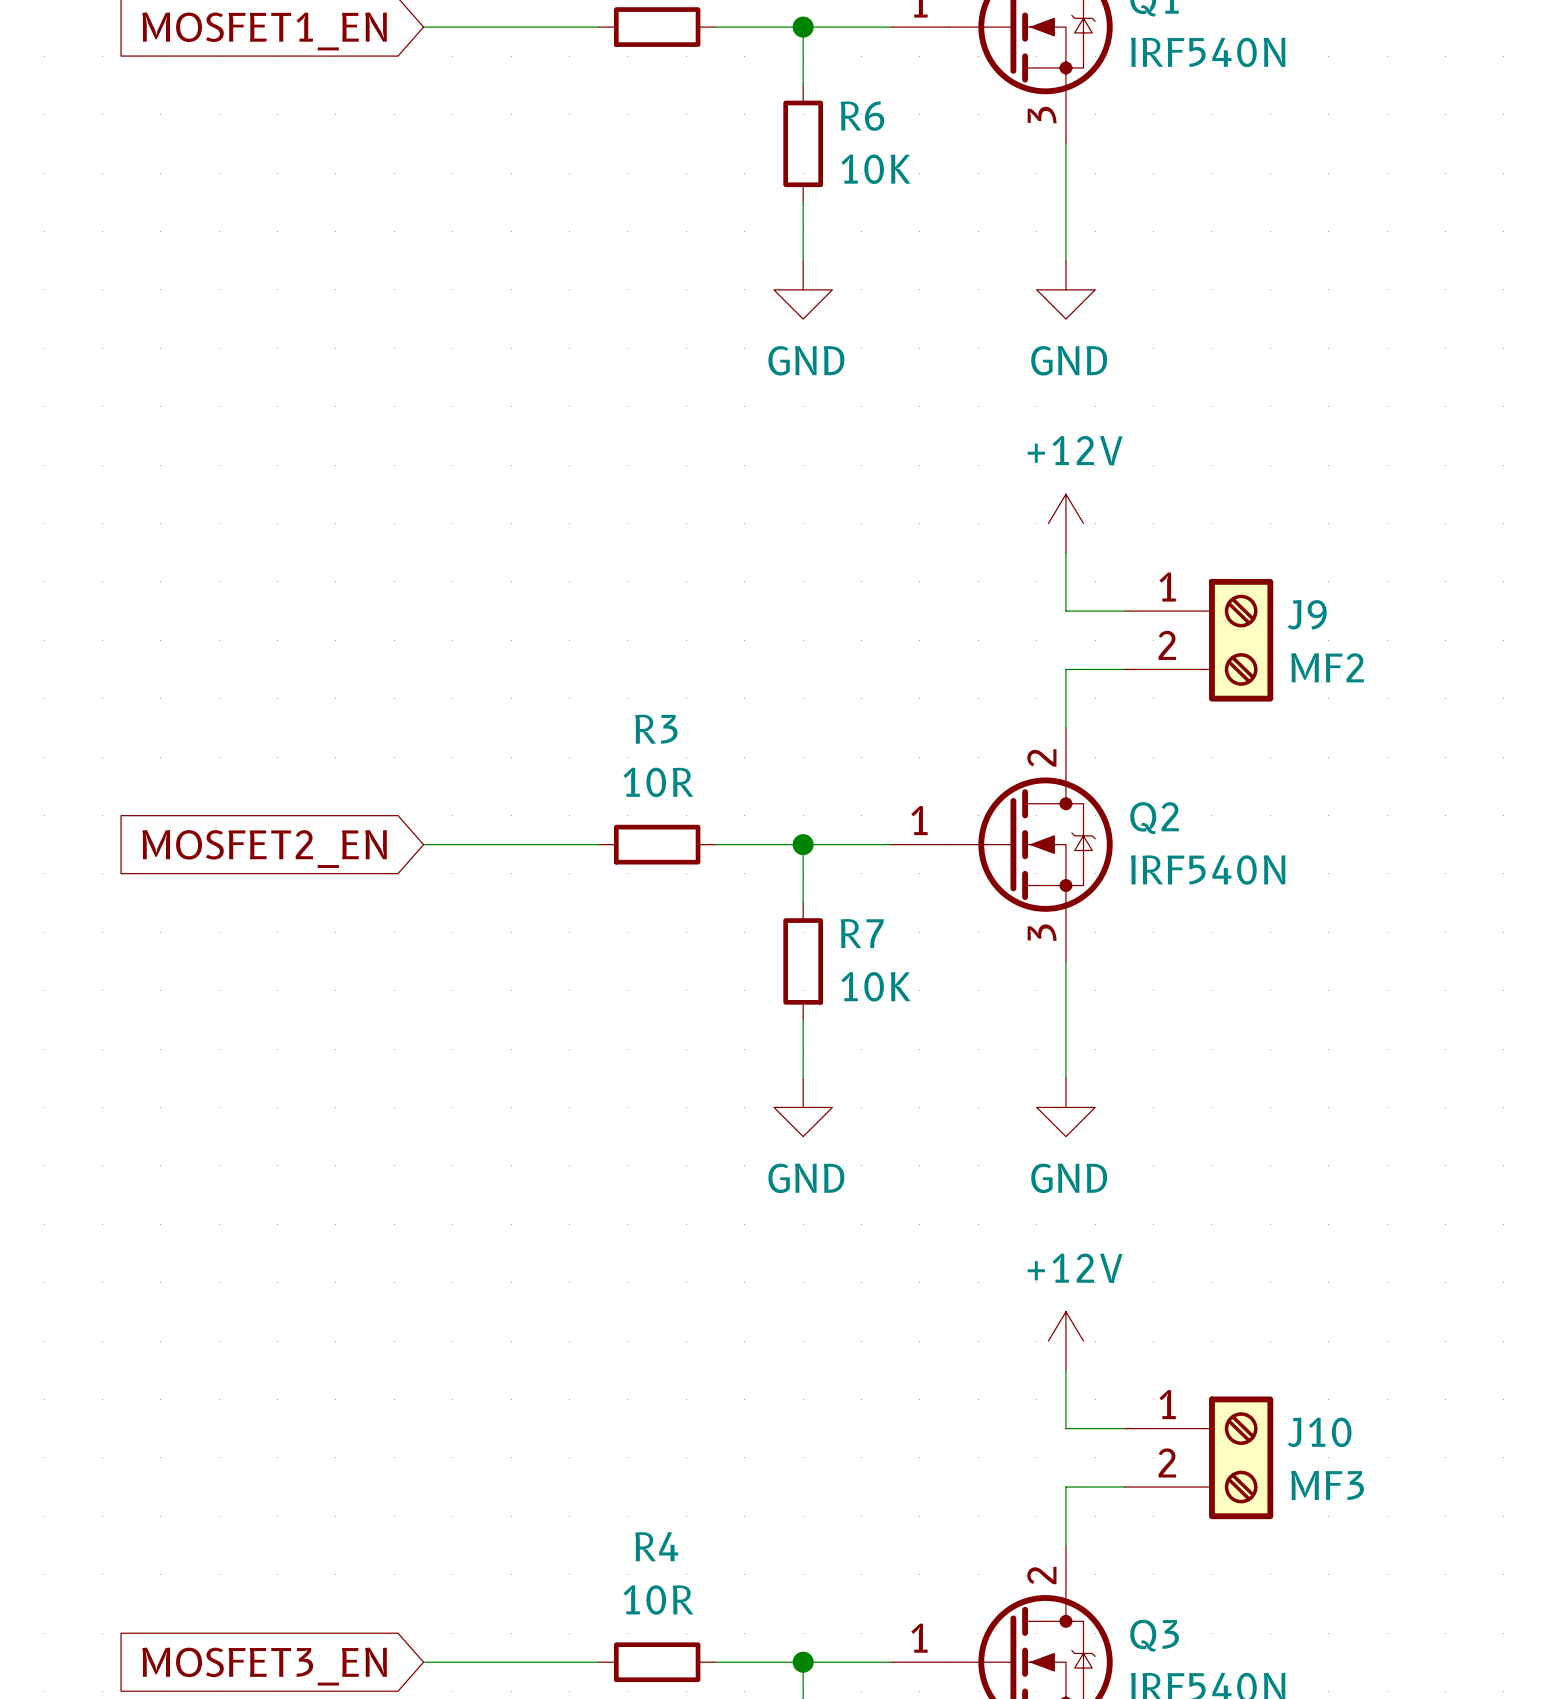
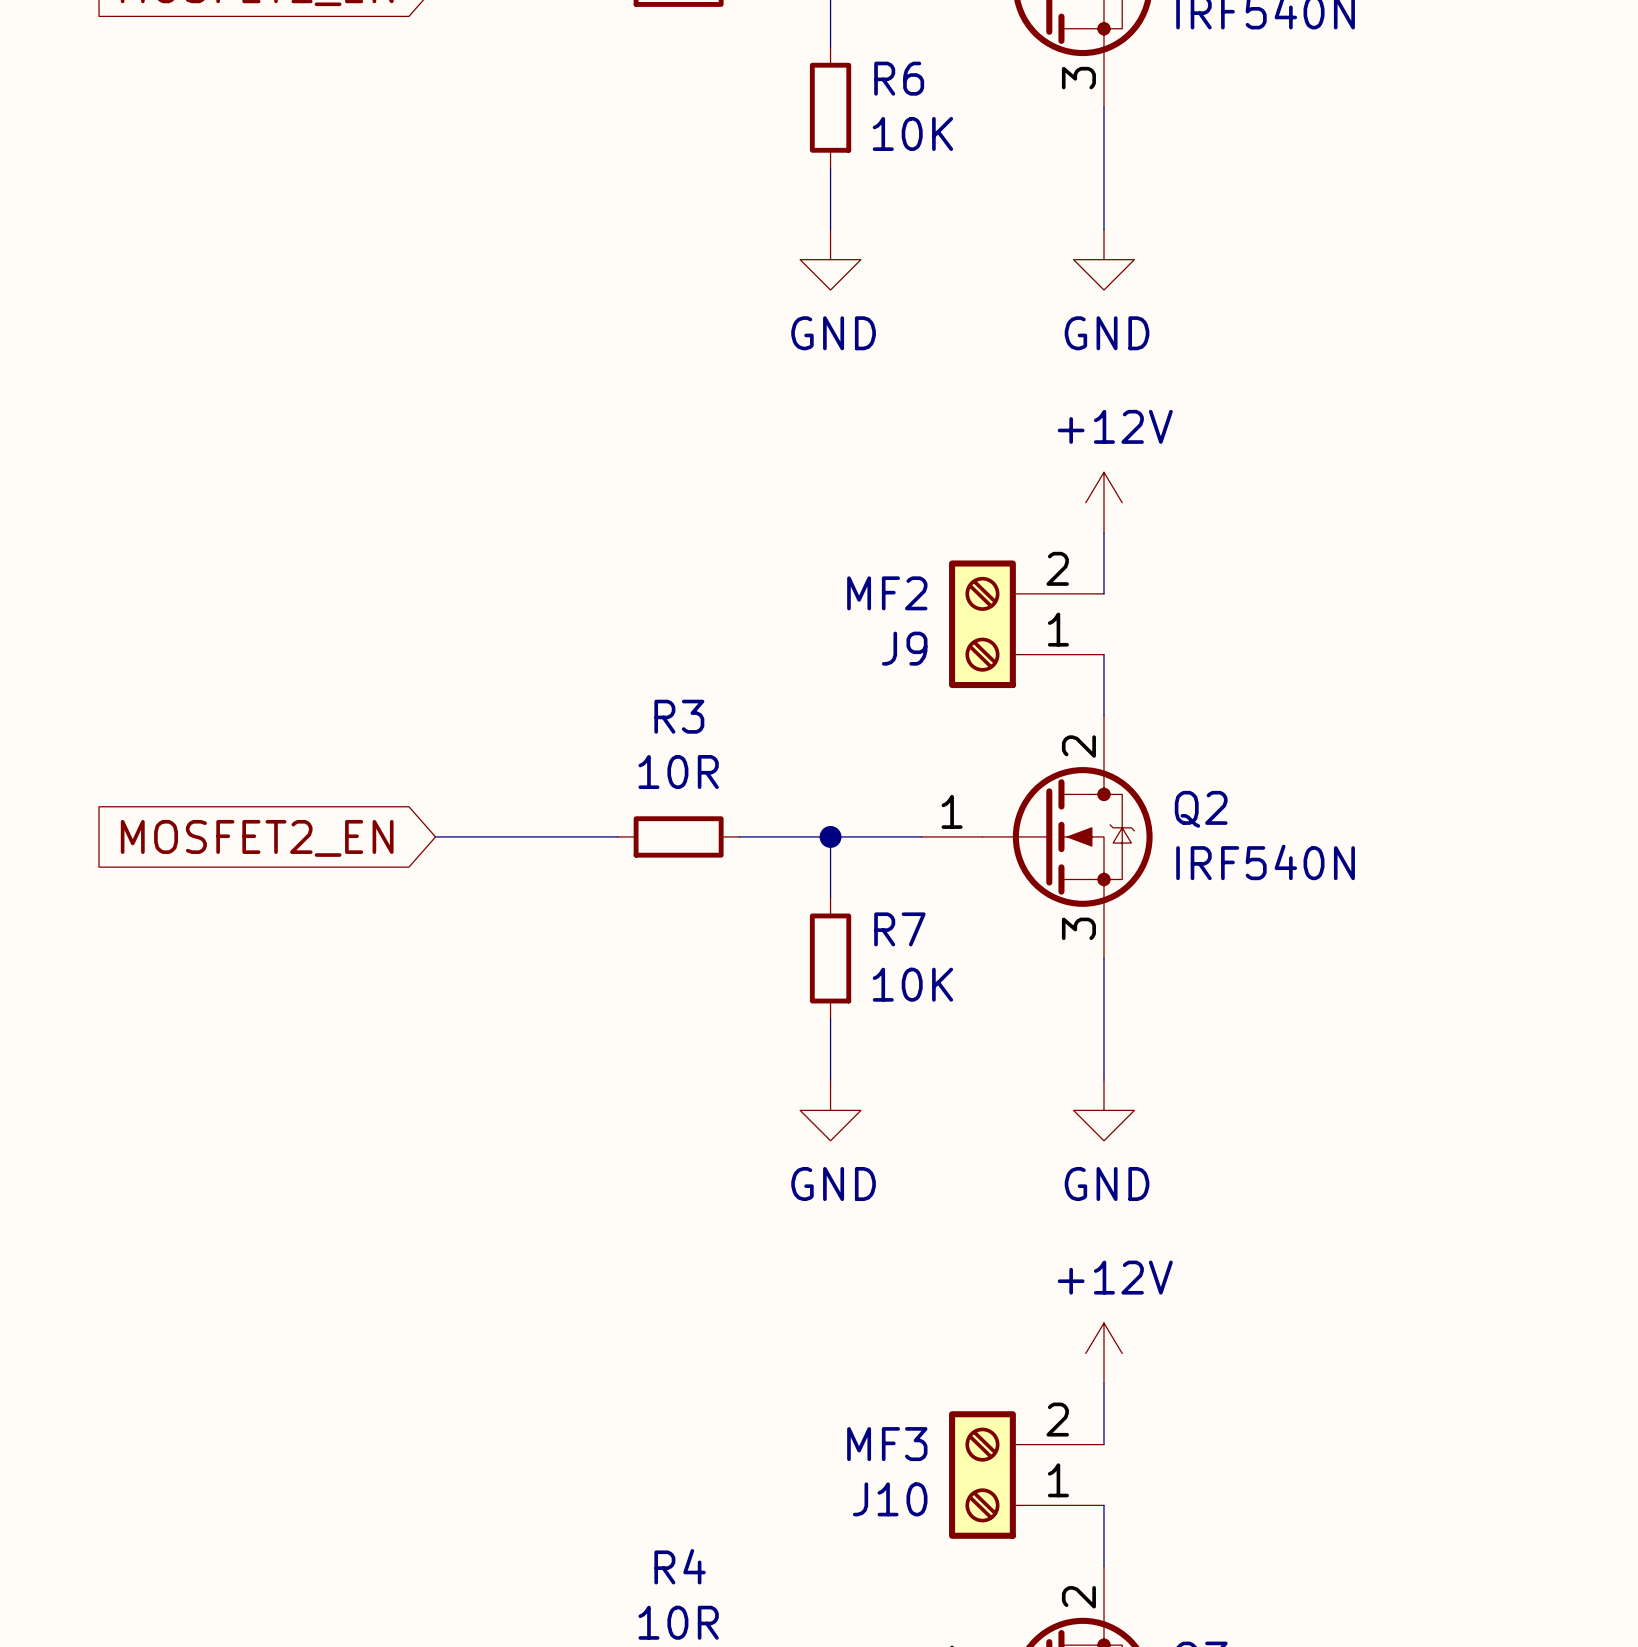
wire: (1065, 611) (1124, 611) -> none
J9 position: (1198, 640) -> (1026, 624)
J9 rotation: 0° (1241, 640) -> 180° (982, 624)
wire: (1065, 669) (1124, 669) -> none
wire: (1065, 1428) (1124, 1428) -> none
J10 position: (1198, 1457) -> (1026, 1475)
J10 rotation: 0° (1241, 1457) -> 180° (982, 1475)
wire: (1065, 1487) (1124, 1487) -> none

